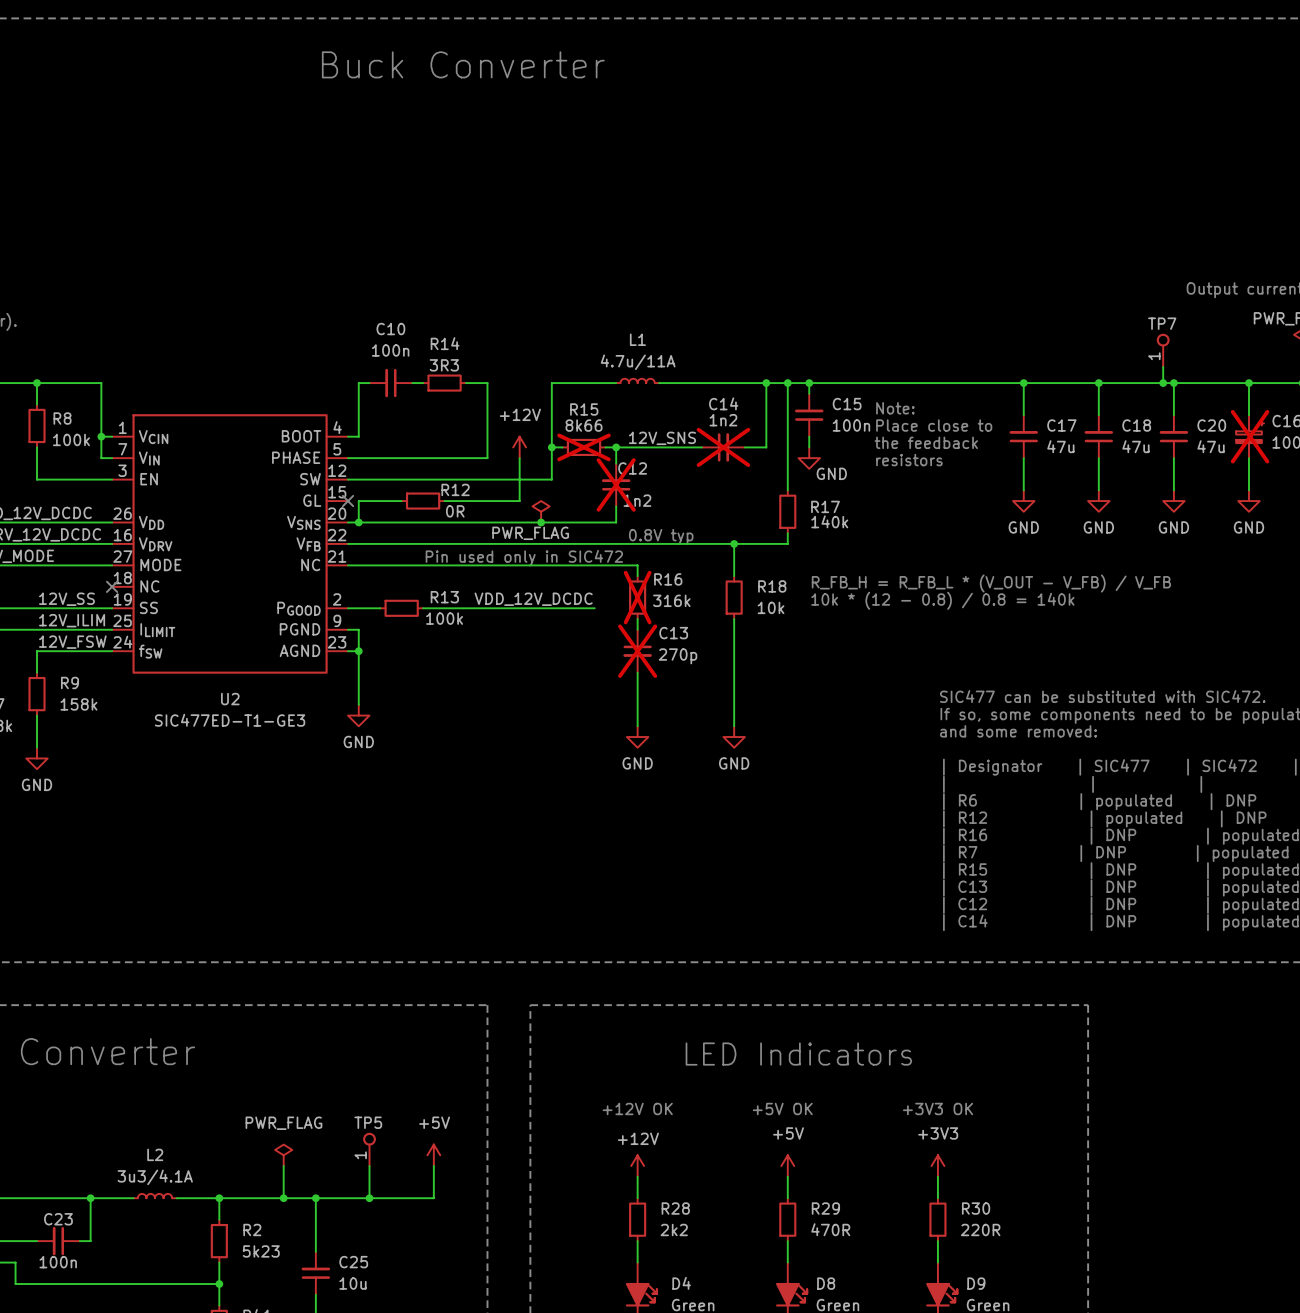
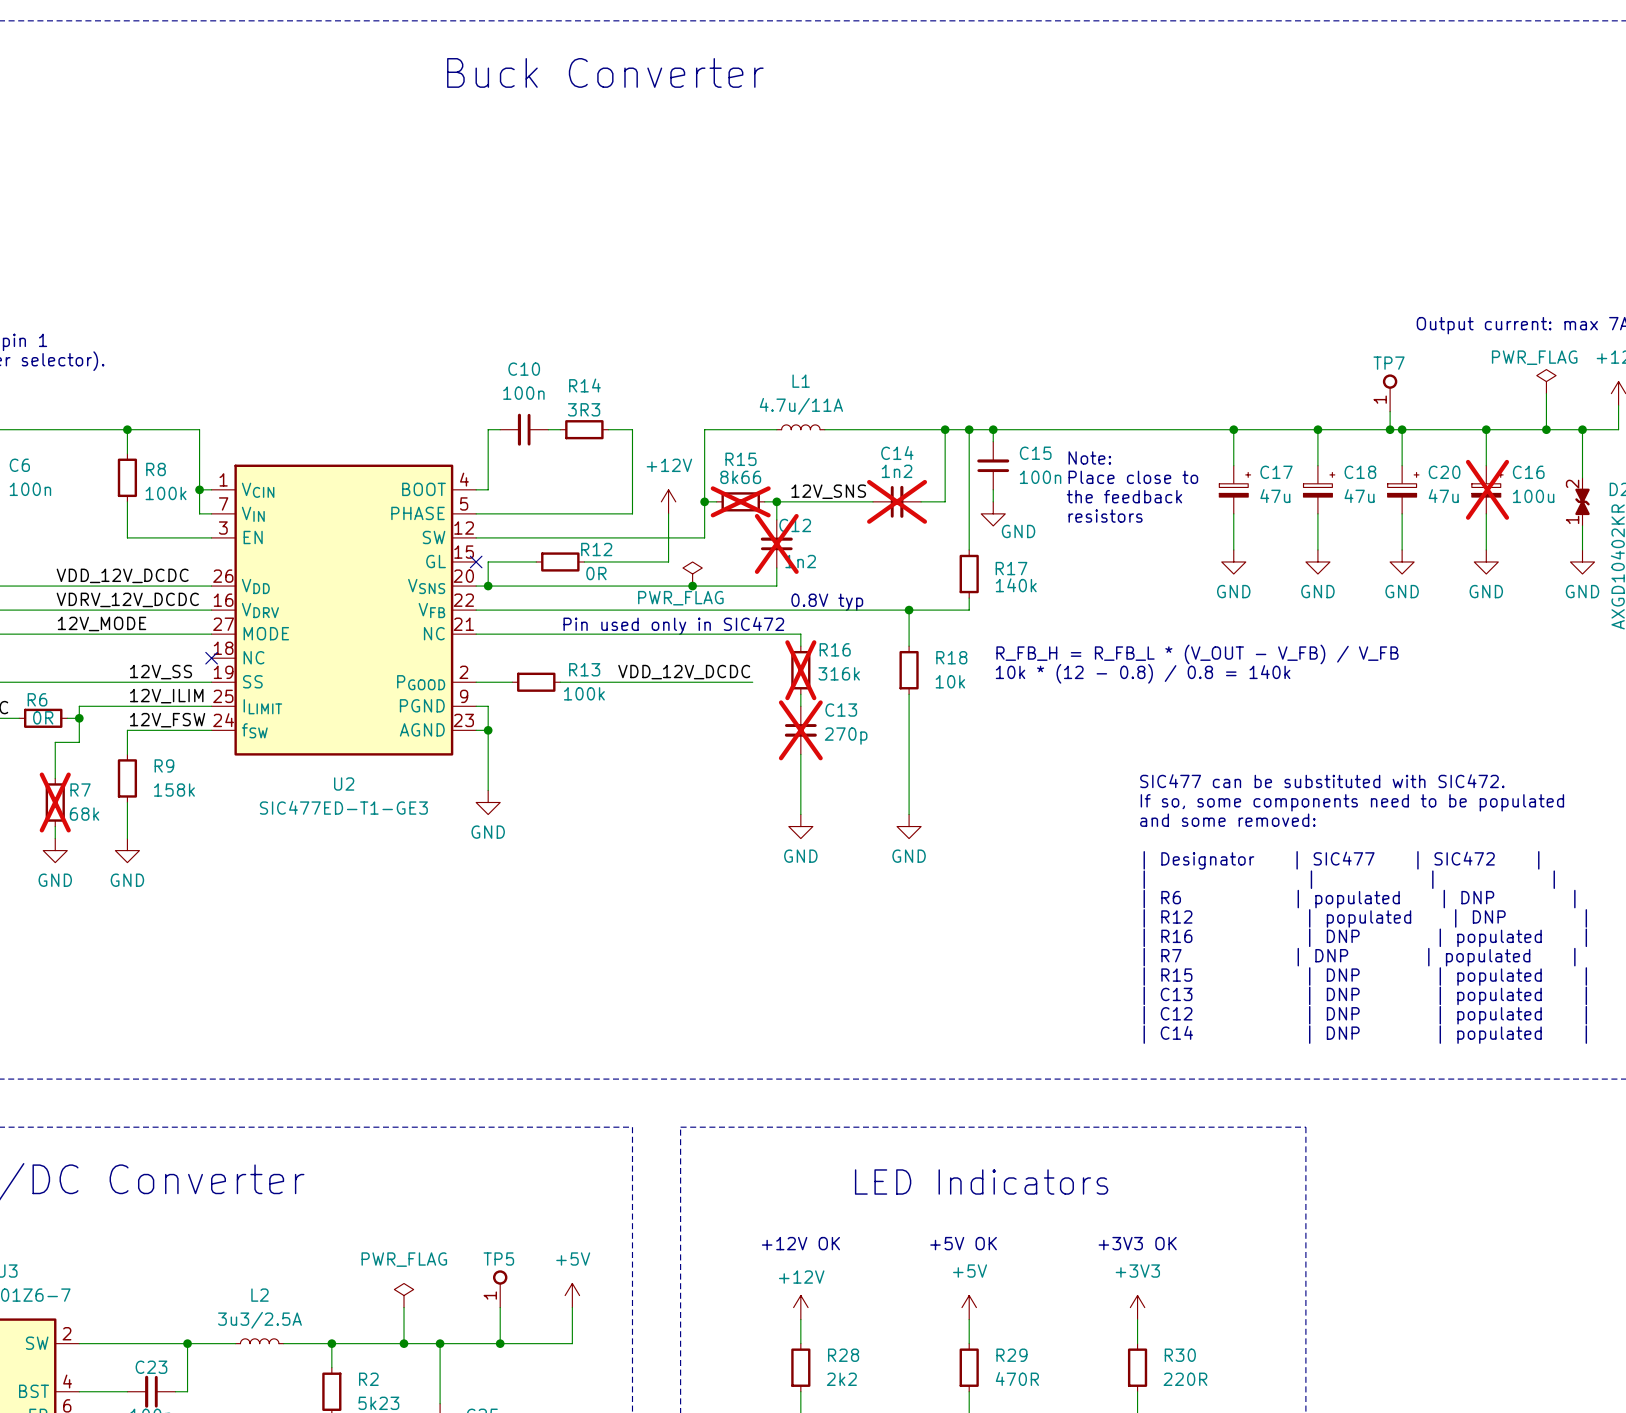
C17 symbol: [1009, 415, 1039, 459] -> [1219, 465, 1251, 514]
C18 symbol: [1084, 415, 1114, 459] -> [1303, 465, 1335, 514]
C20 symbol: [1159, 415, 1189, 459] -> [1387, 465, 1419, 514]
L2 text: 3u3/4.1A (155, 1177) -> 3u3/2.5A (259, 1320)

